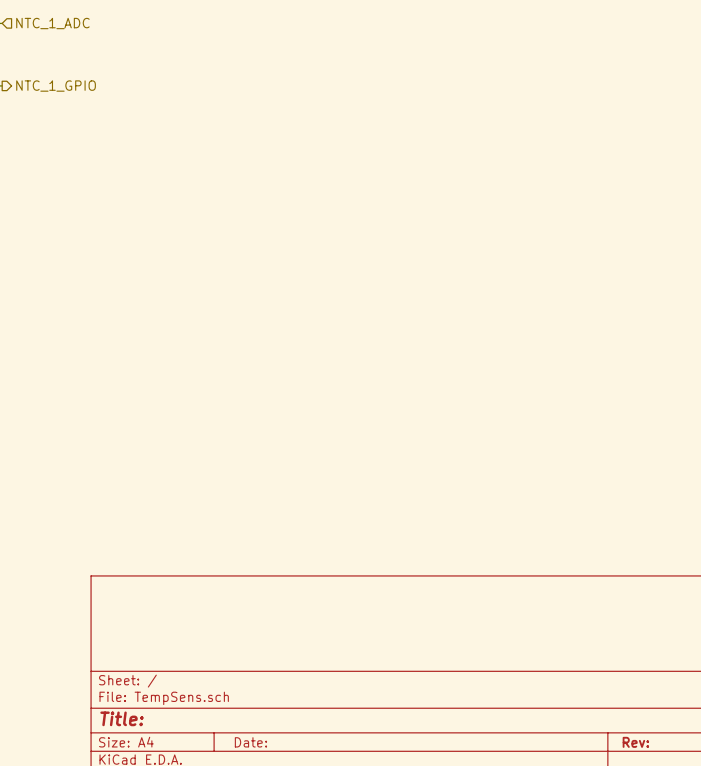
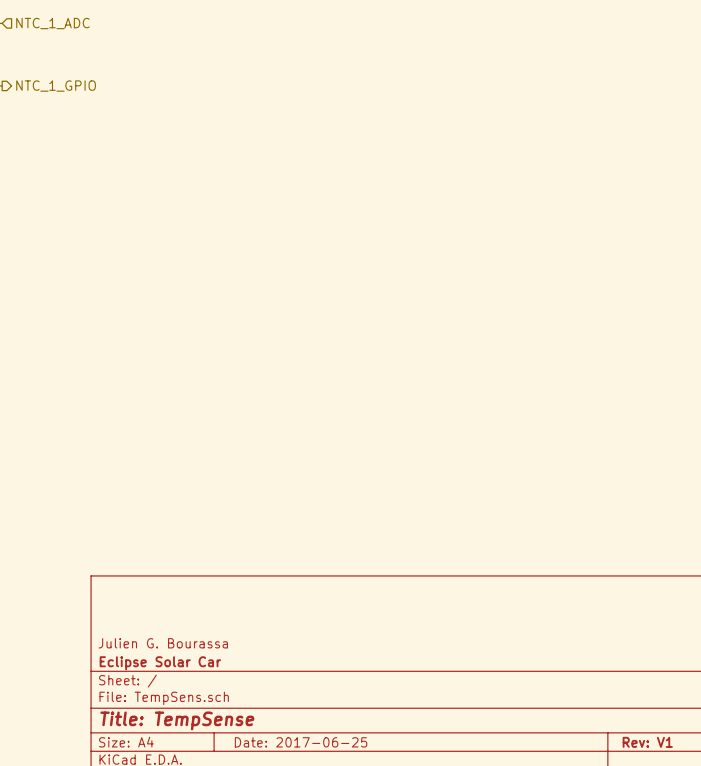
title block: none -> Julien G. Bourassa (163, 643)
title block: none -> Eclipse Solar Car (160, 663)
title block: Title: (122, 718) -> Title: TempSense (177, 720)
title block: Date: (250, 742) -> Date: 2017-06-25 (301, 742)
title block: Rev: (635, 742) -> Rev: V1 (647, 742)

